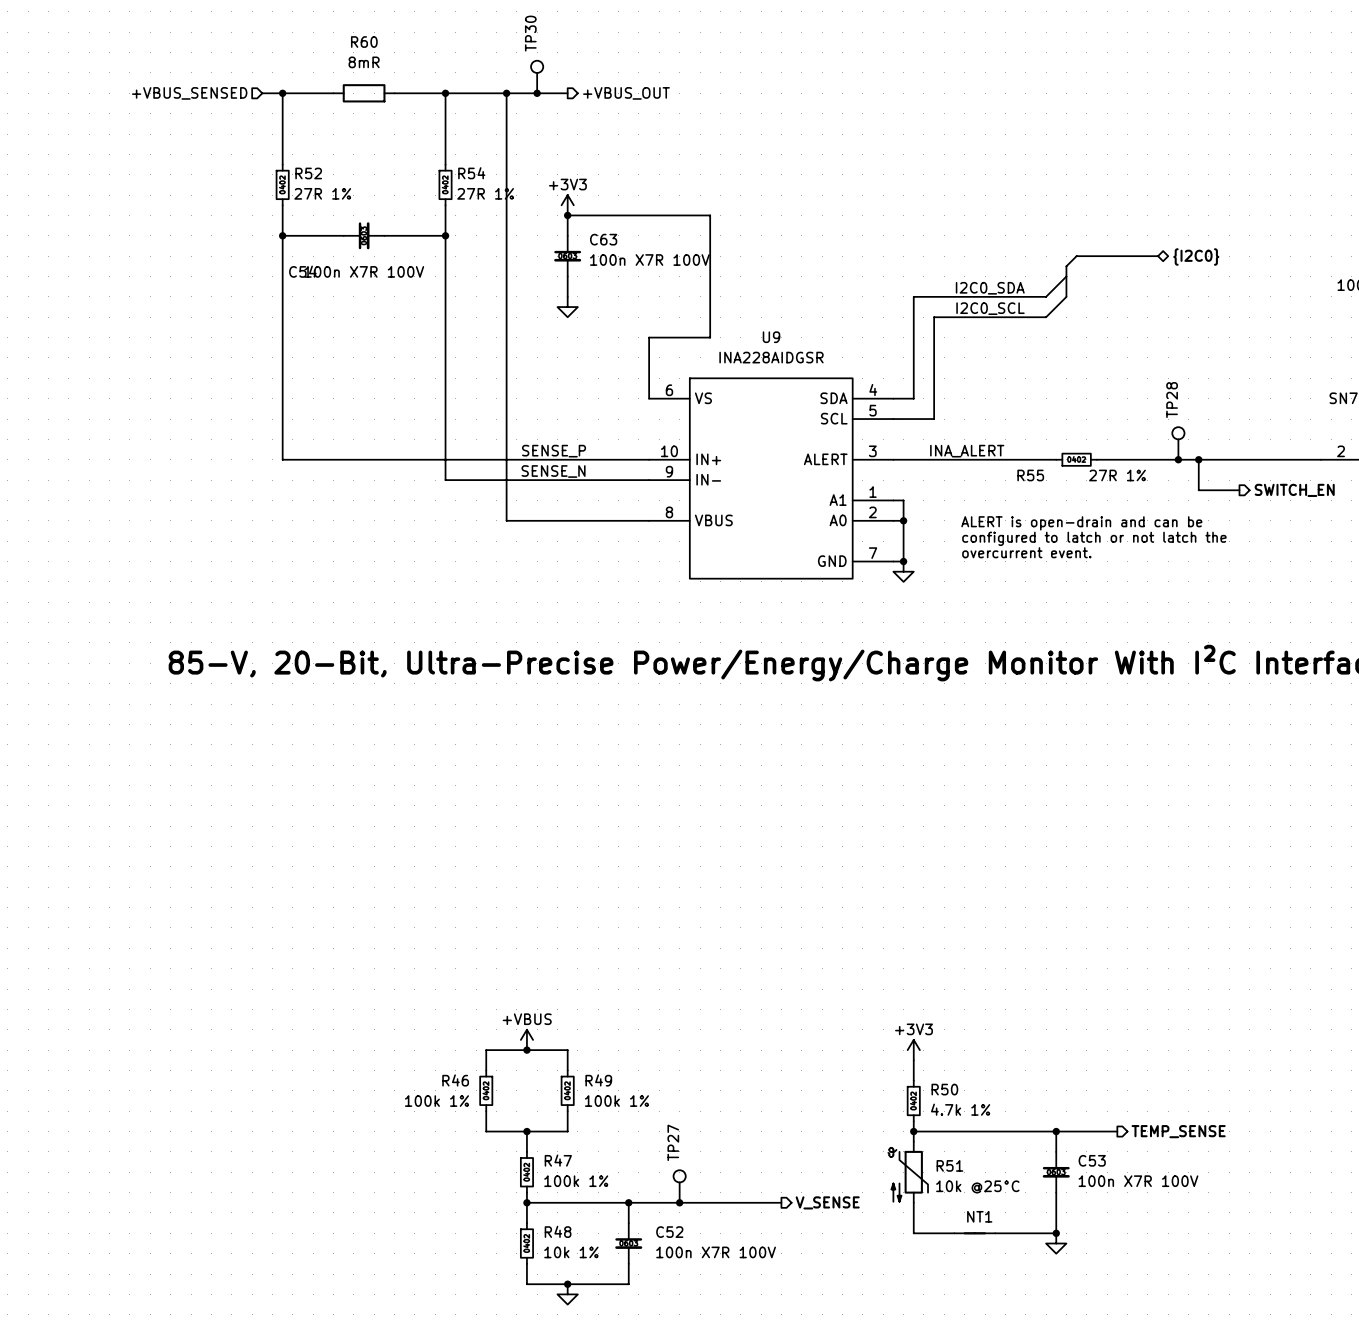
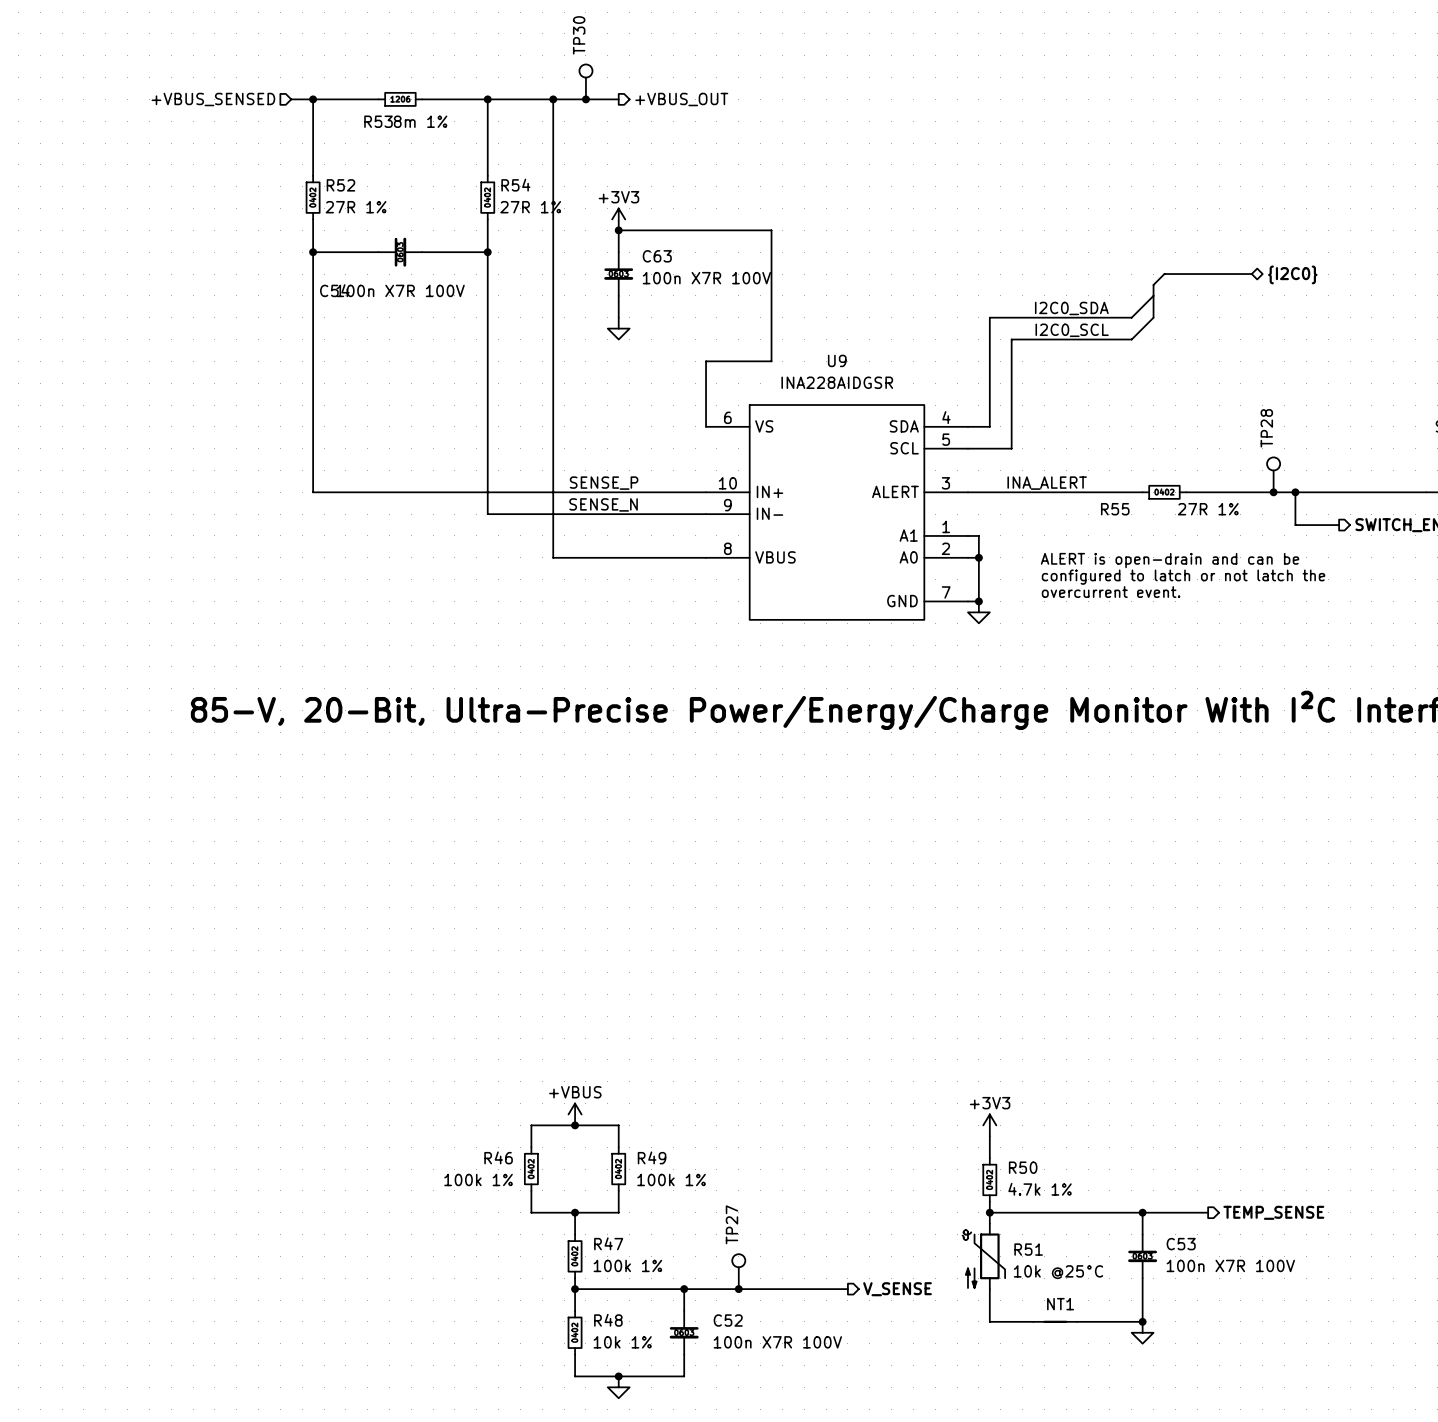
R60: 8mR (364, 93) -> none
R53: none -> 8m 1% (400, 99)

